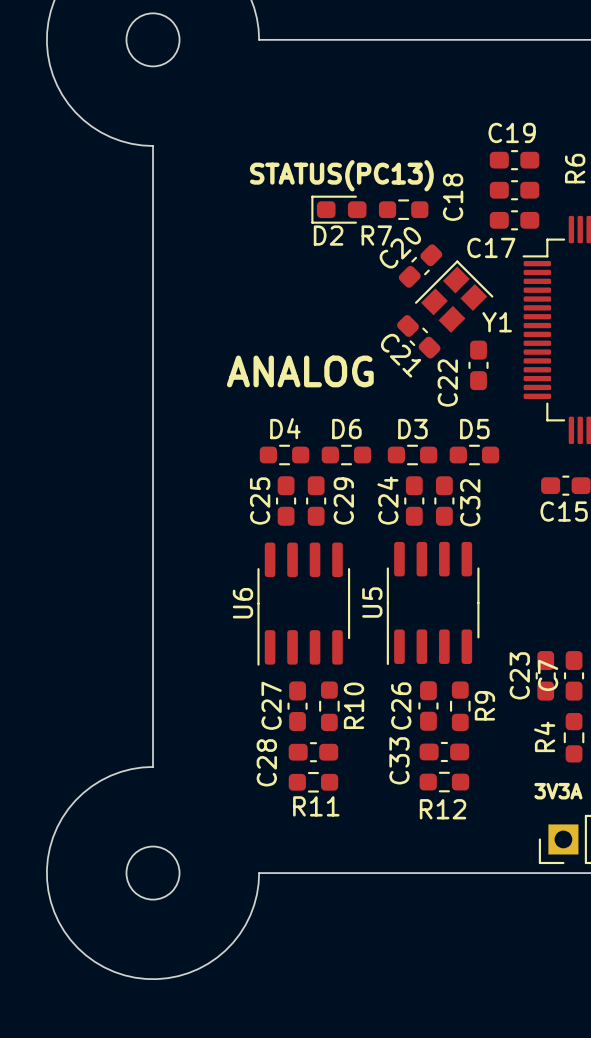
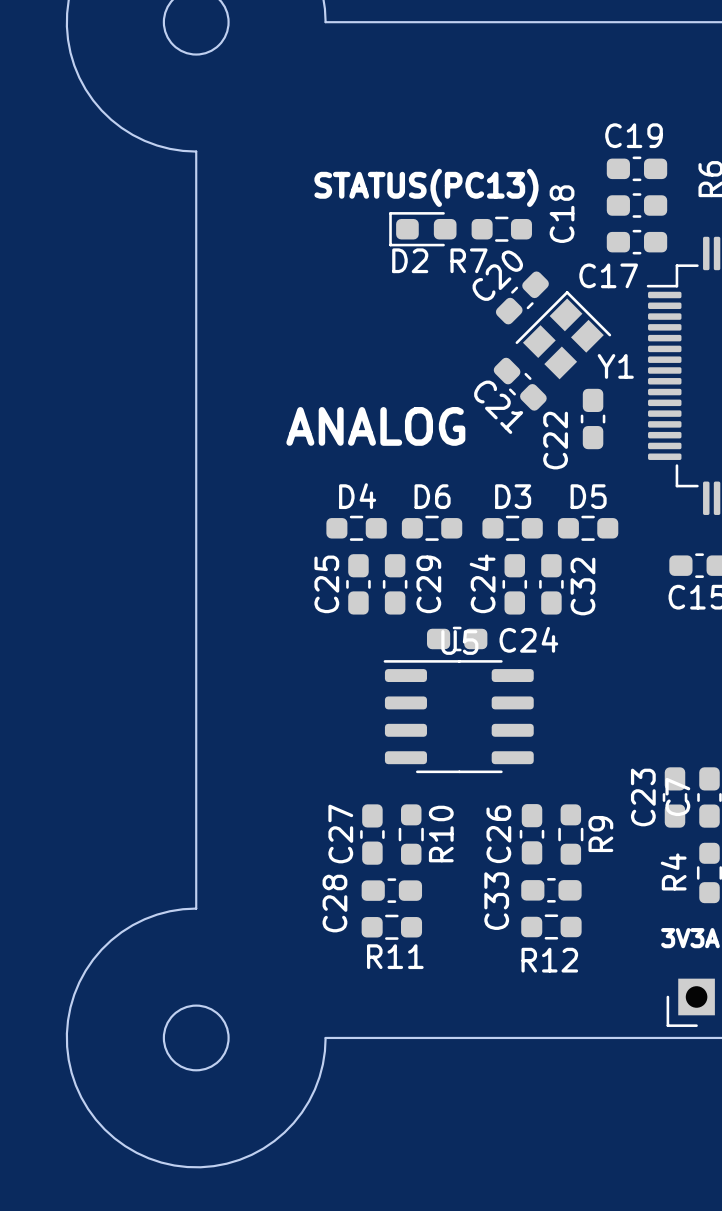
C24: none -> (457, 638)
U5 rotation: 0° (433, 603) -> 90° clockwise (458, 716)
U6: (303, 604) -> none

